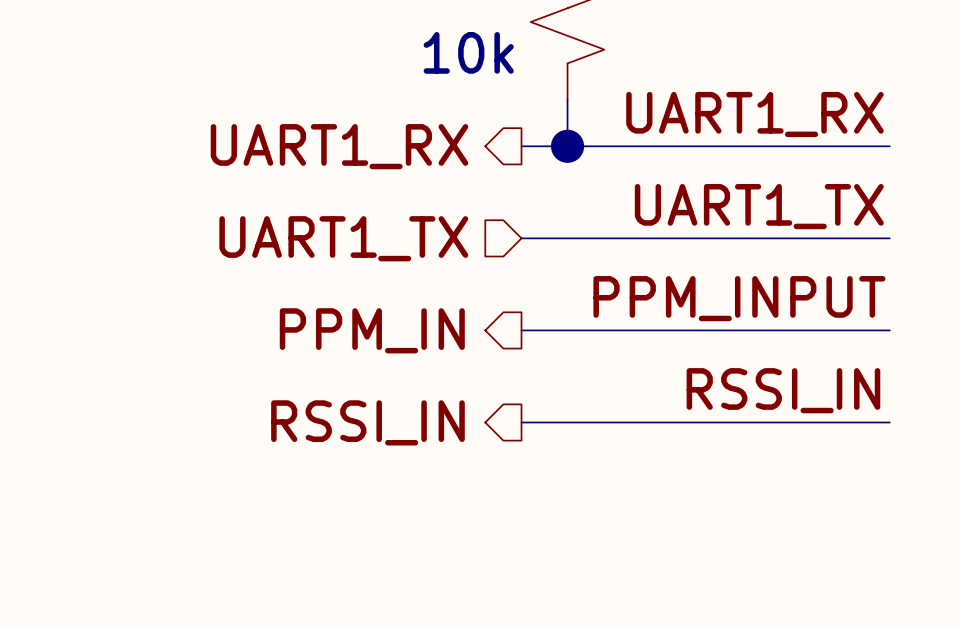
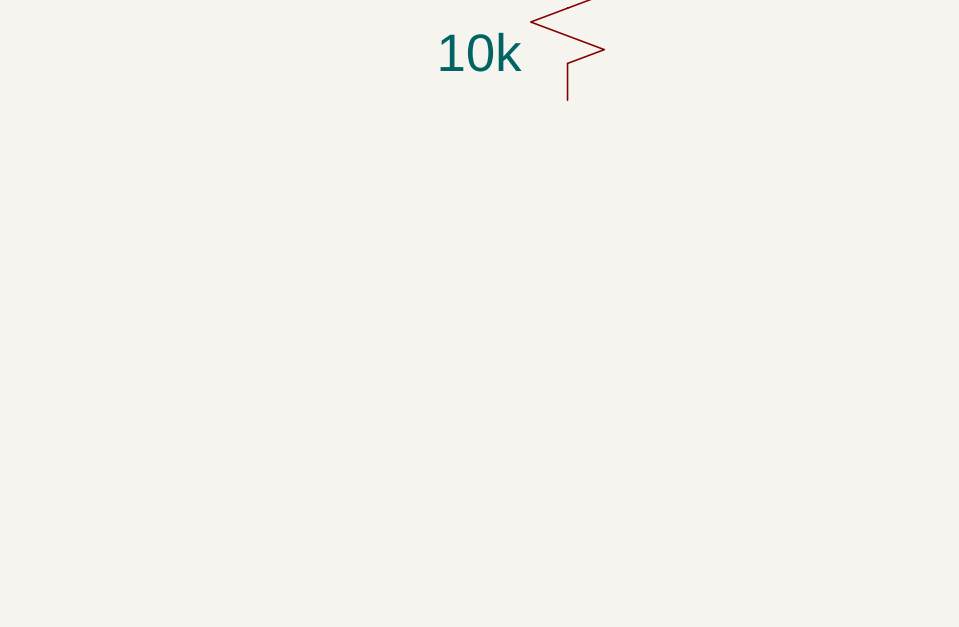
wire: (567, 100) (567, 146) -> none
label: UART1_RX (754, 114) -> none
hierarchical label: UART1_RX (339, 146) -> none
wire: (521, 146) (889, 146) -> none
junction: (567, 146) -> none
label: UART1_TX (759, 206) -> none
hierarchical label: UART1_TX (343, 238) -> none
wire: (521, 238) (889, 238) -> none
label: PPM_INPUT (739, 298) -> none
hierarchical label: PPM_IN (372, 330) -> none
wire: (521, 330) (889, 330) -> none
label: RSSI_IN (783, 390) -> none
hierarchical label: RSSI_IN (367, 422) -> none
wire: (521, 422) (889, 422) -> none

